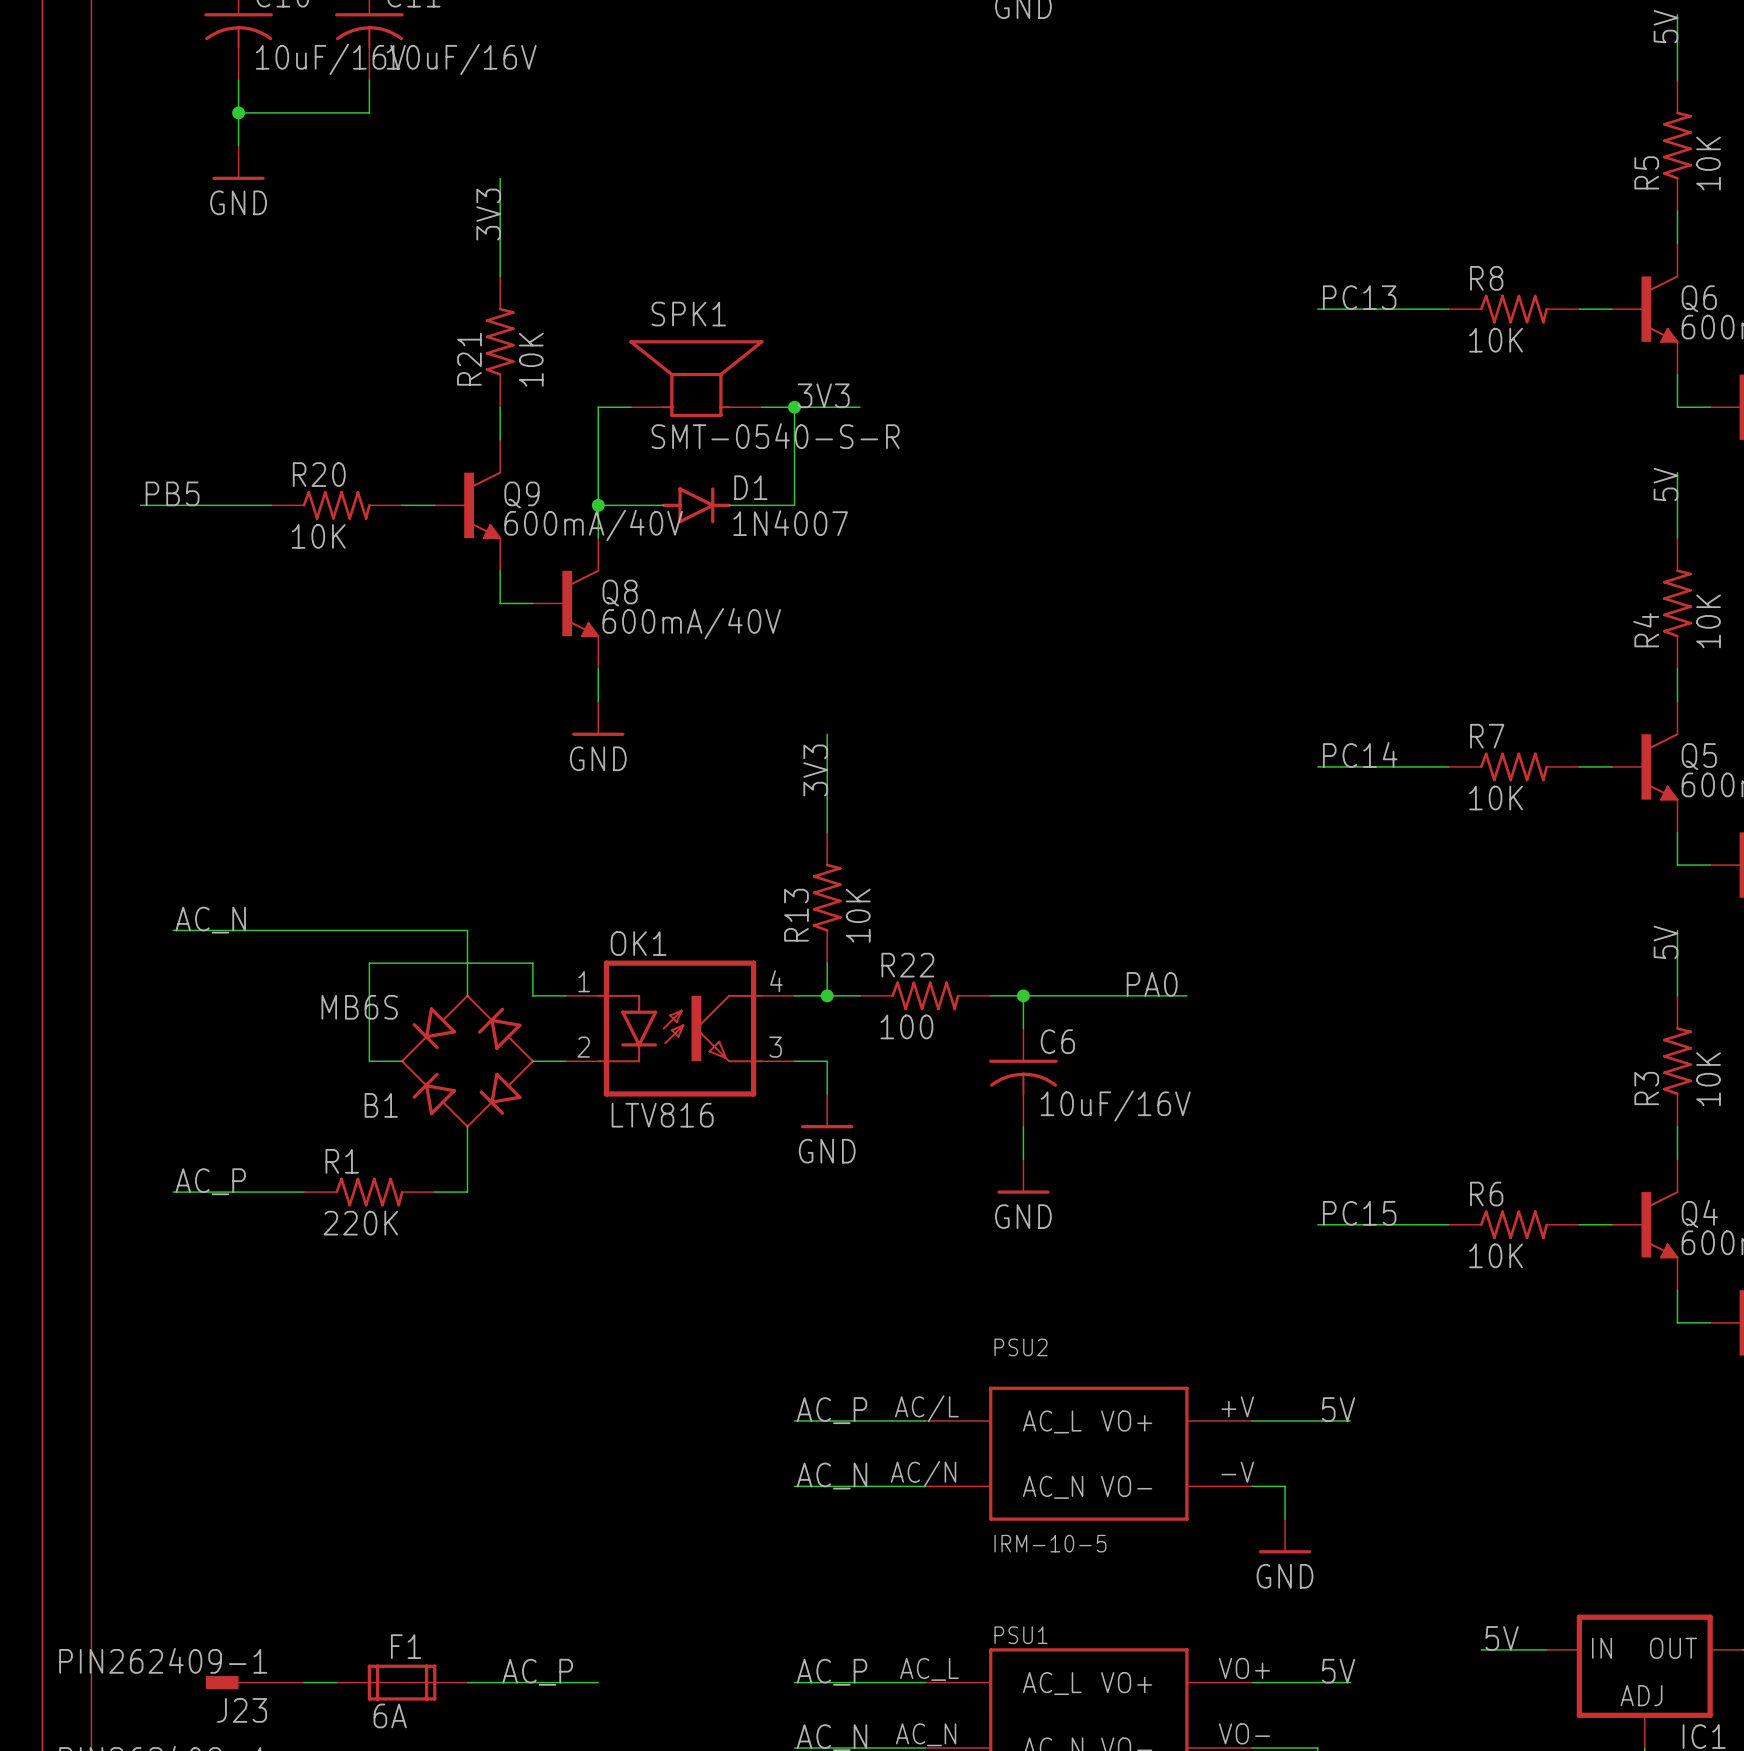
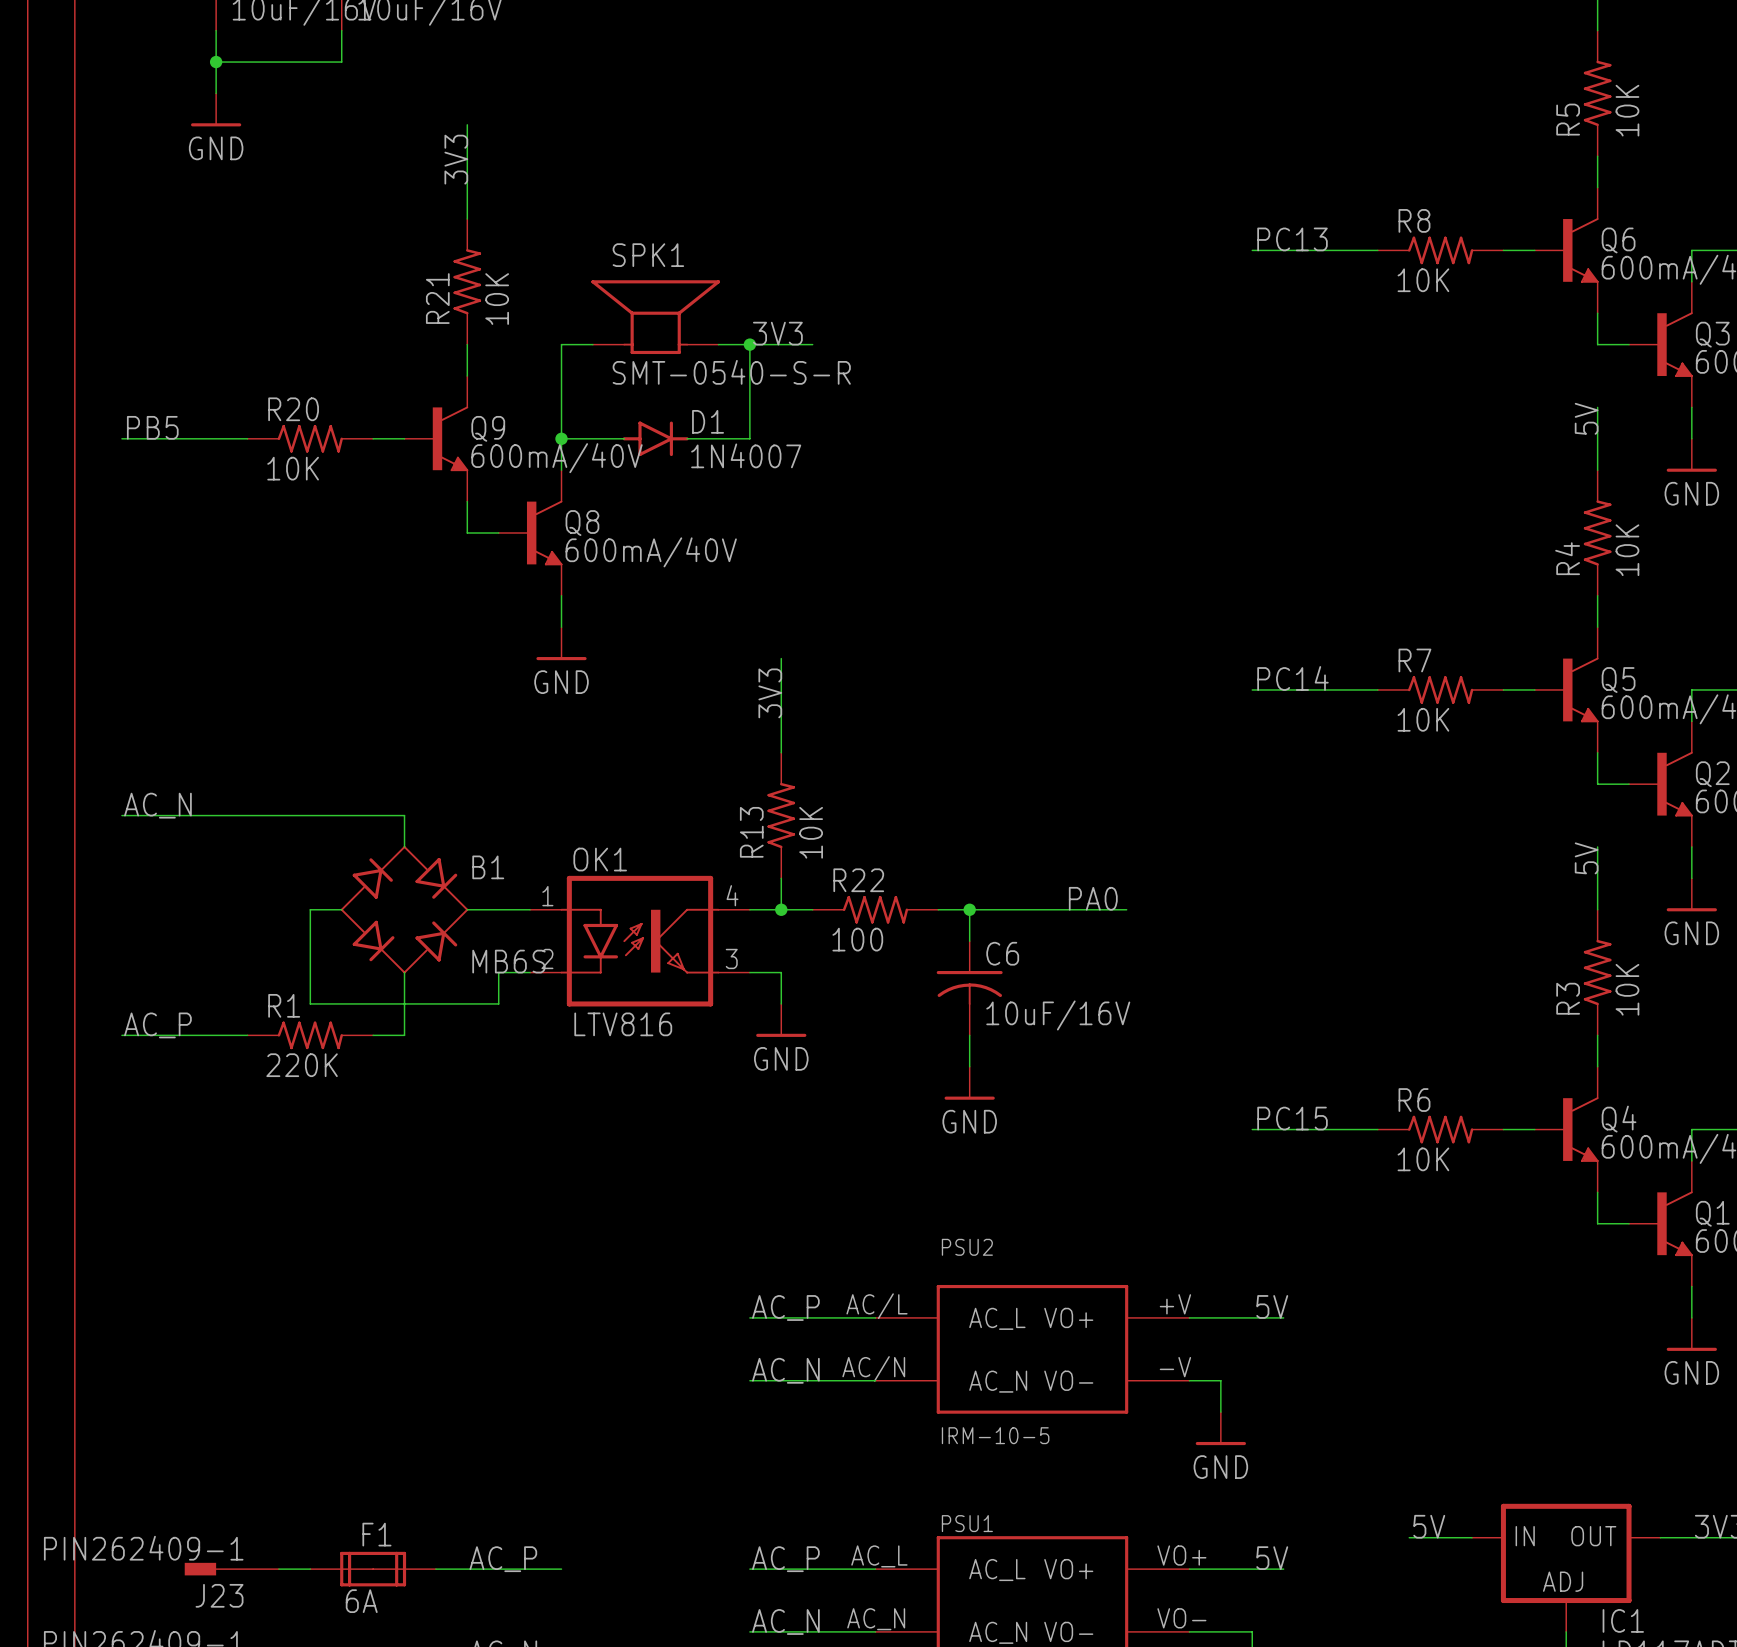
wire: none -> (121, 815) (404, 815) (404, 846)
label position: AC_N (210, 920) -> AC_N (157, 805)
wire: (173, 930) (467, 930) (467, 995) -> none
wire: none -> (341, 909) (310, 909) (310, 1003) (498, 1003) (498, 972)
wire: (532, 995) (532, 963) (369, 963) (369, 1061) (402, 1061) -> (498, 909) (467, 909)
B1 rotation: 0° (467, 1061) -> 180° (404, 909)
wire: (467, 1126) (467, 1192) (434, 1192) -> (404, 972) (404, 1035) (373, 1035)
label position: AC_P (210, 1181) -> AC_P (157, 1025)
wire: (173, 1192) (303, 1192) -> (121, 1035) (247, 1035)
R1 position: (369, 1192) -> (310, 1035)

